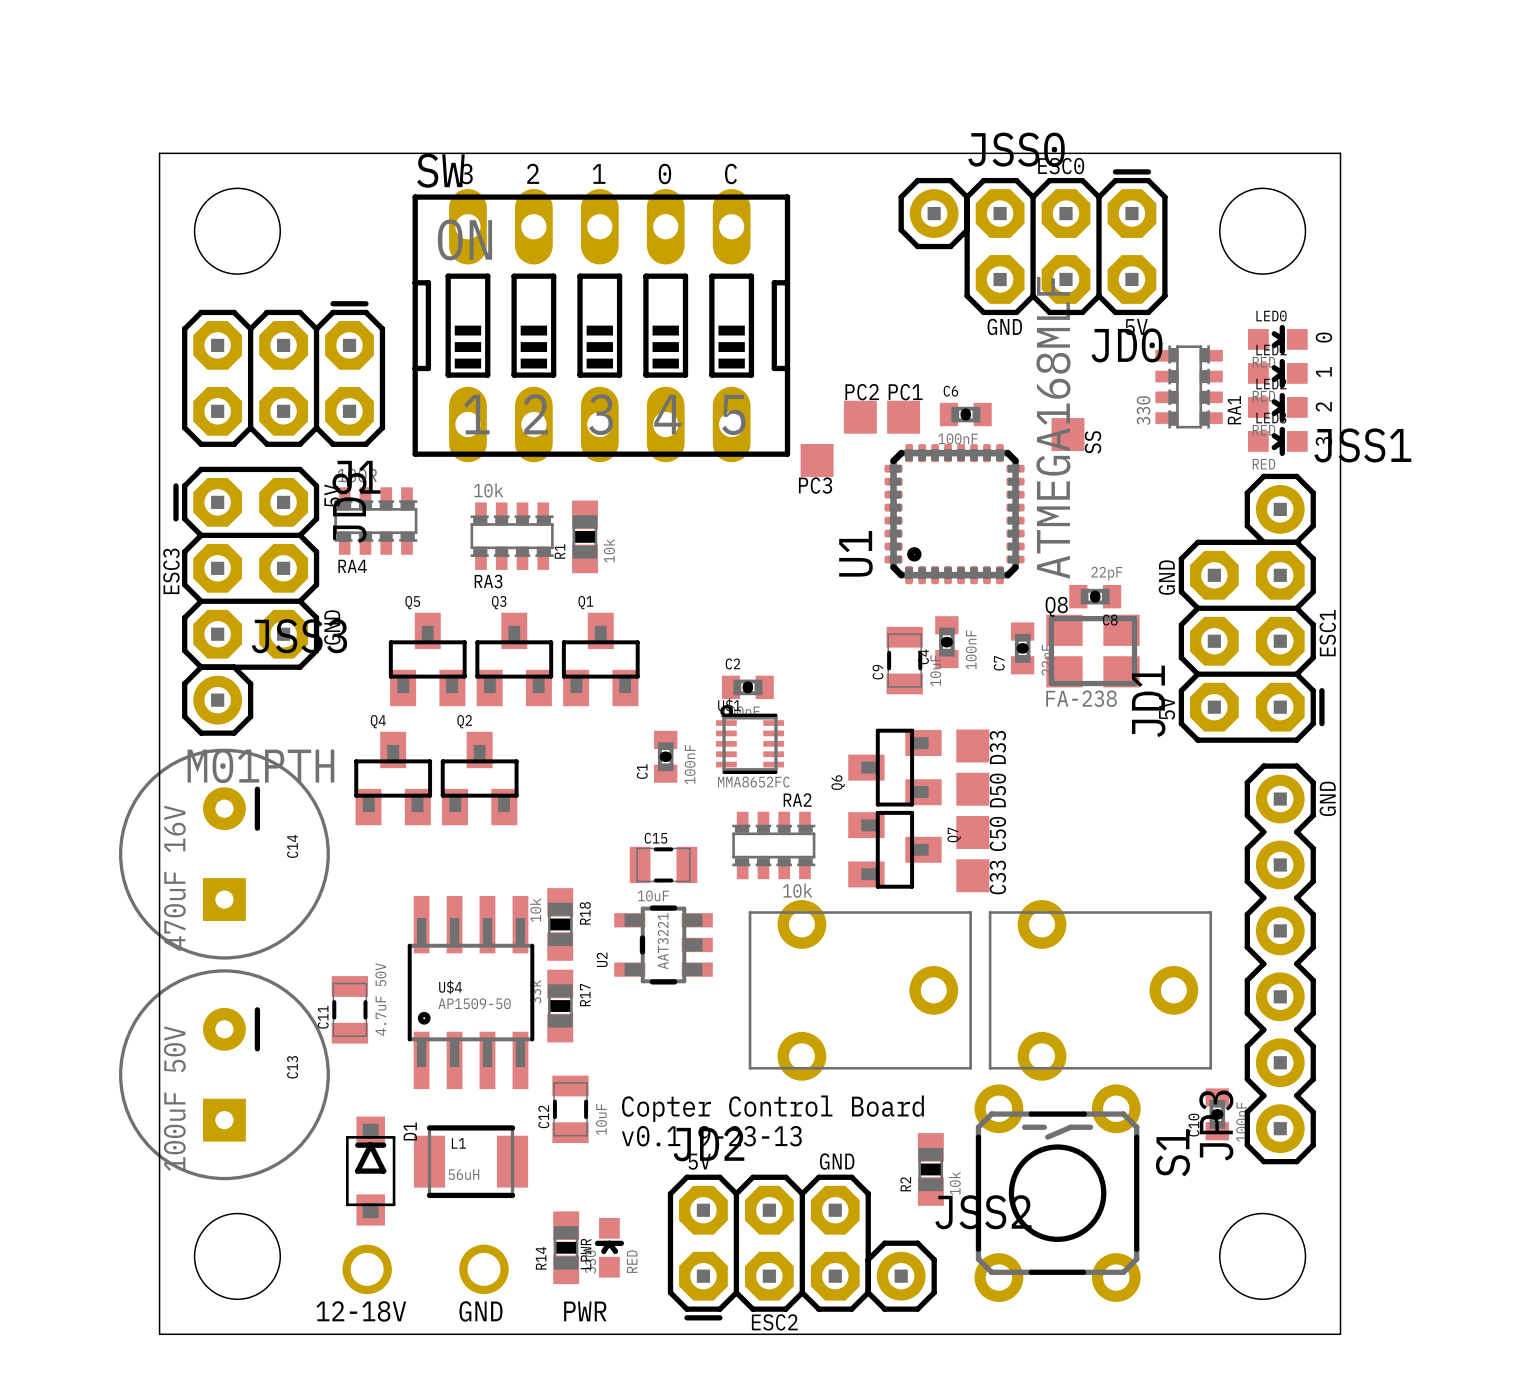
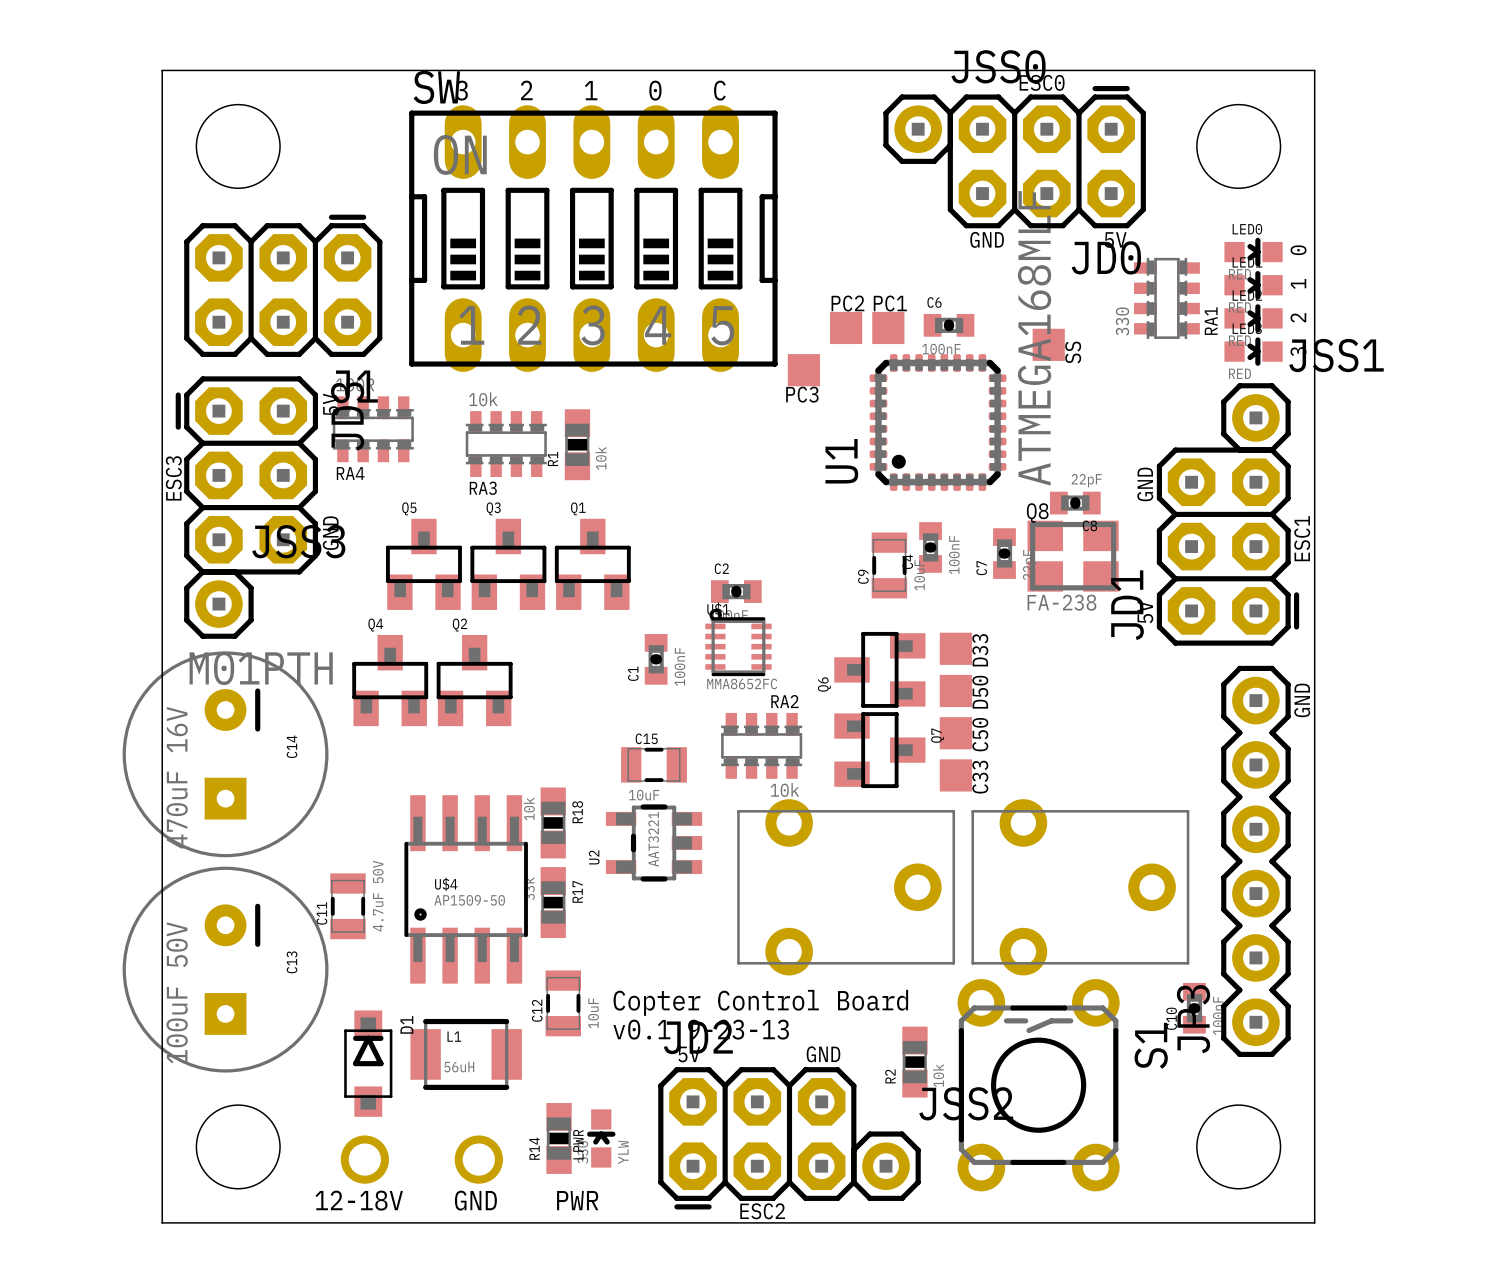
LPWR value: RED (632, 1261) -> YLW (623, 1152)

